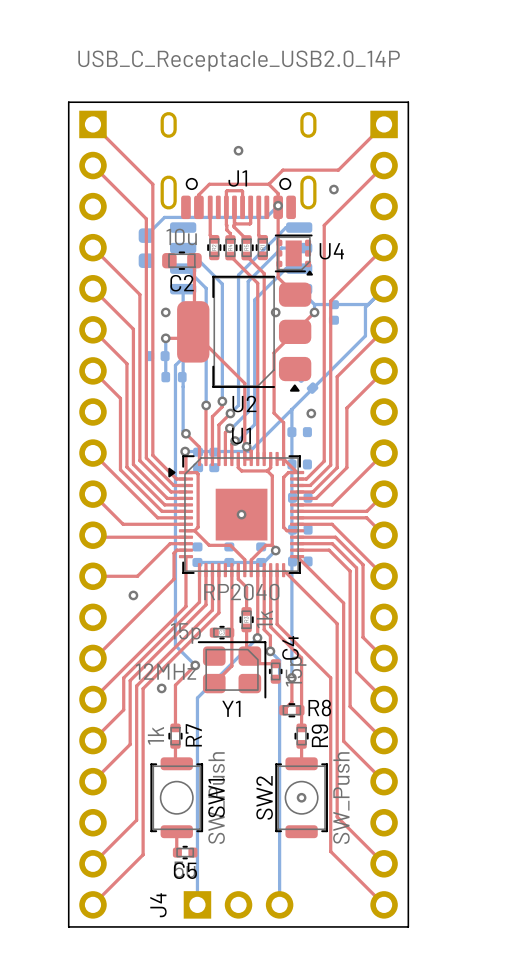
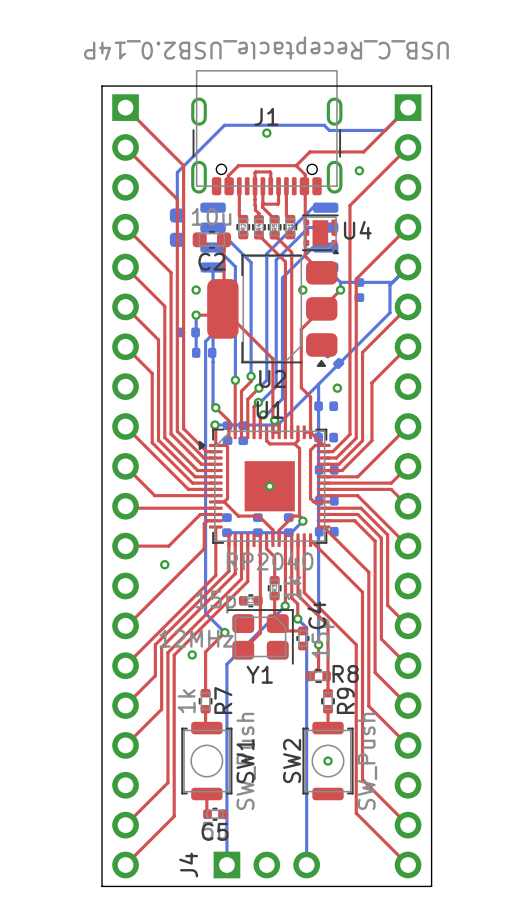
J1 footprint: [160, 112, 317, 220] -> [191, 70, 343, 196]
bottom track: (278, 205) (266, 217) (164, 217) (146, 235) -> (408, 107) (385, 130) (329, 130) (324, 125) (224, 125) (177, 172) (177, 215)
via: (278, 205) -> none

